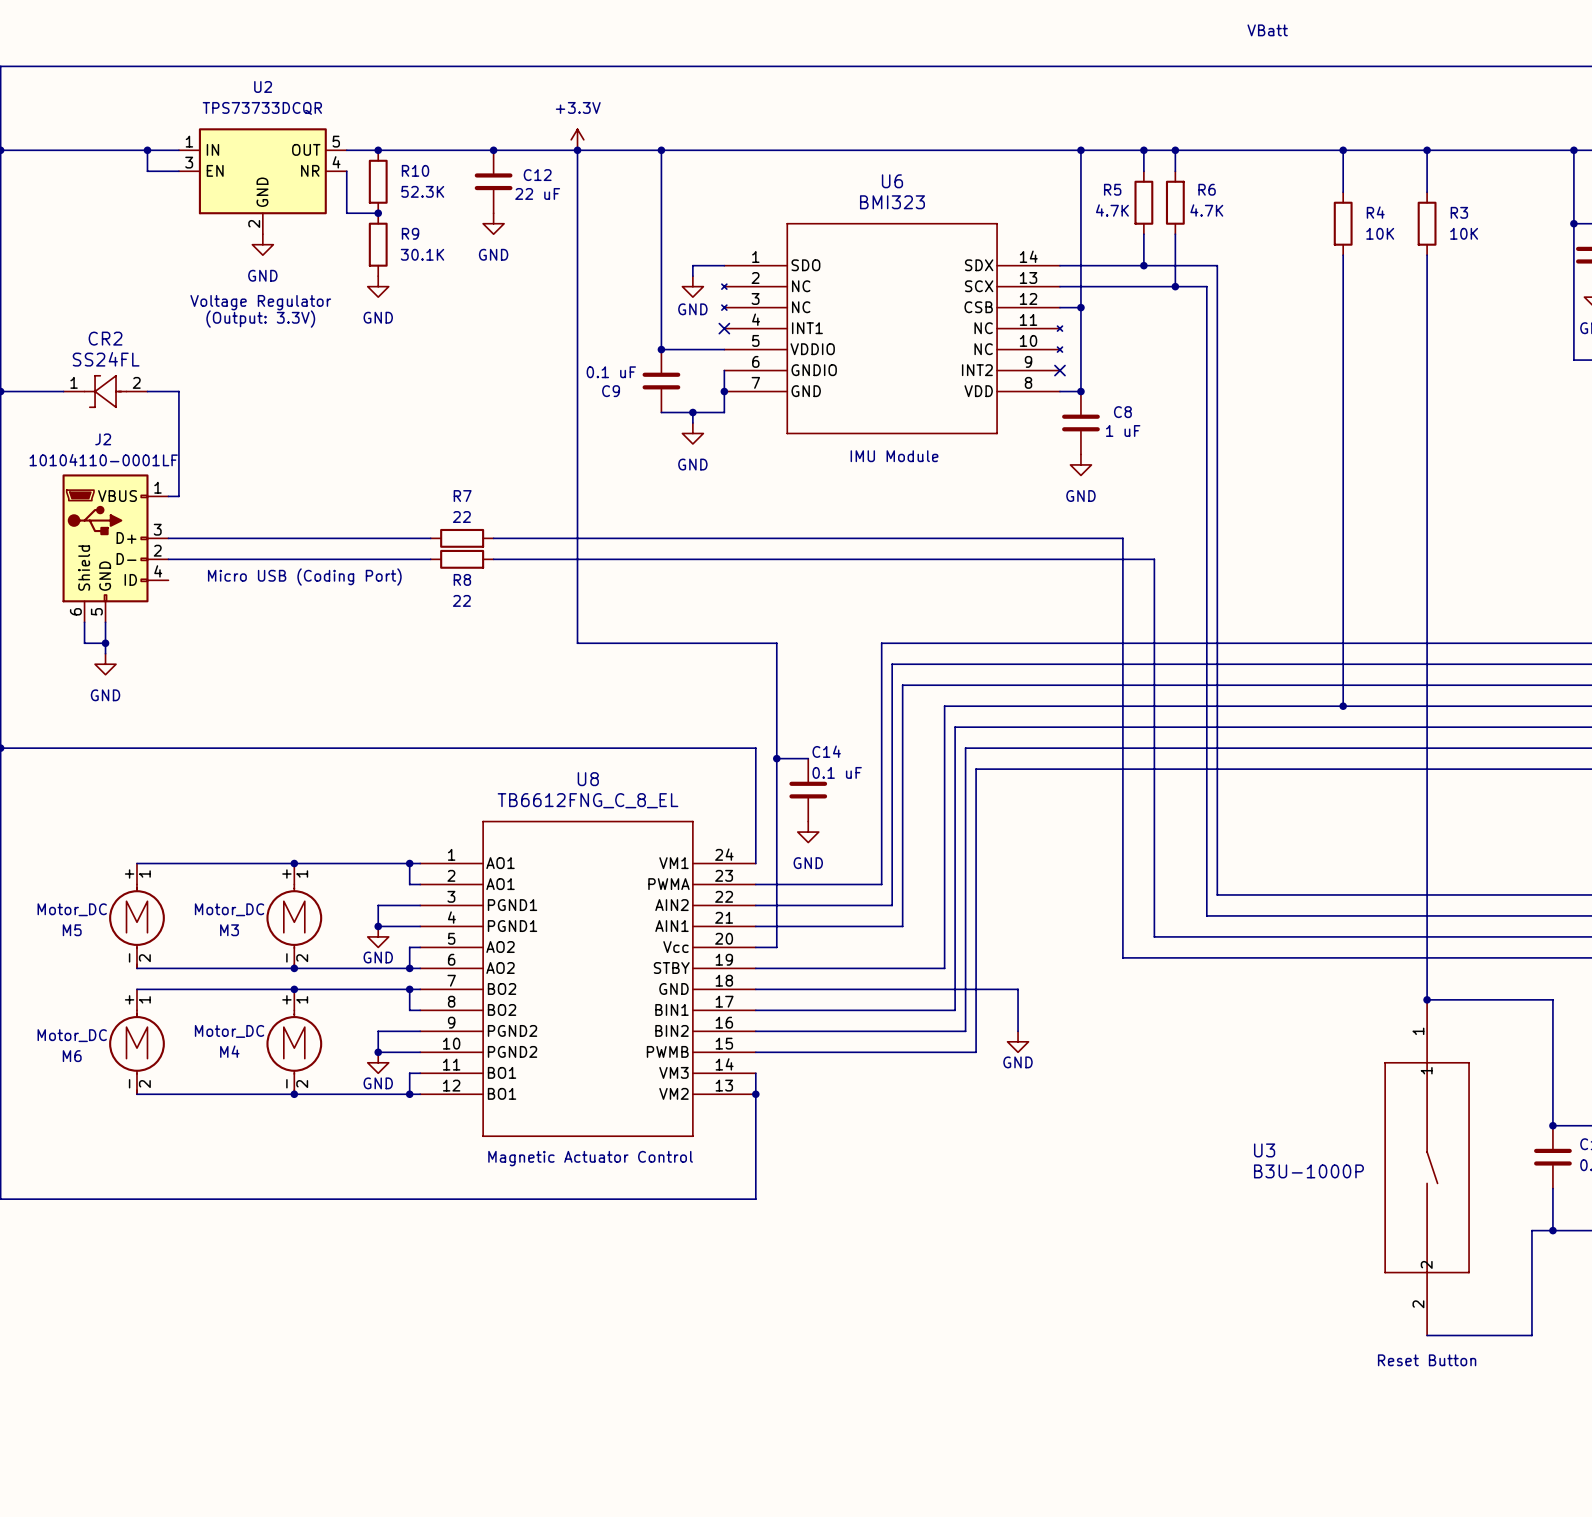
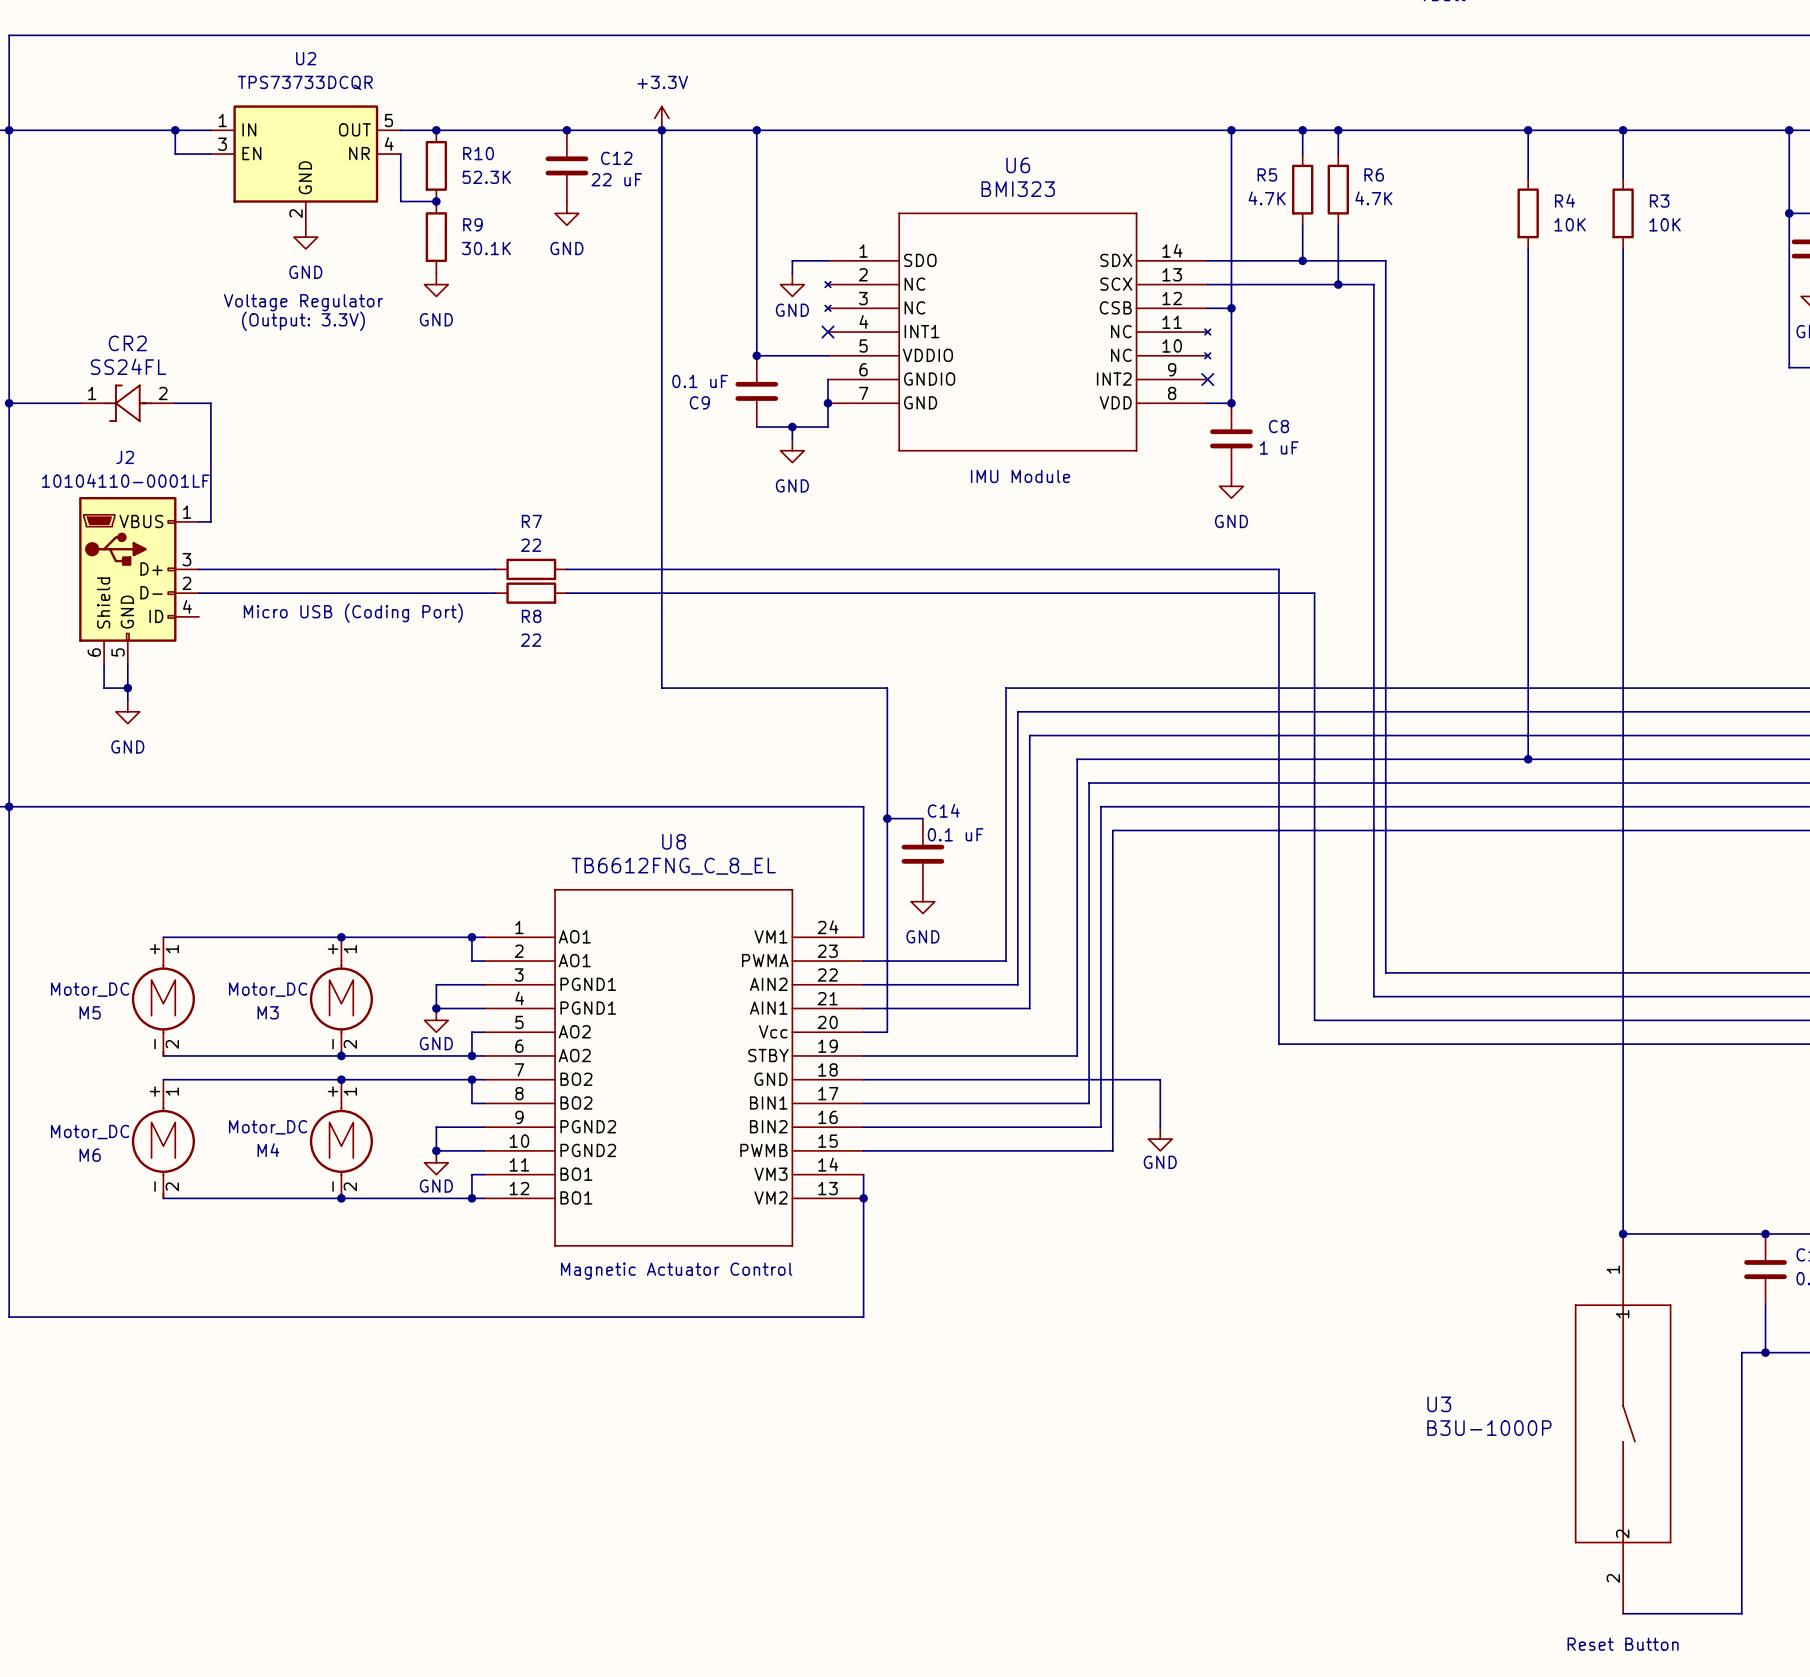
wire: (1427, 999) (1552, 999) (1552, 1125) -> (1623, 1091) (1623, 1233) (1765, 1233)
junction: (1427, 999) -> none
junction: none -> (1623, 1233)
U3 position: (1427, 1167) -> (1623, 1423)
wire: (1427, 1335) (1531, 1335) -> (1623, 1613) (1741, 1613) (1741, 1471)
text position: Reset Button (1427, 1360) -> Reset Button (1623, 1644)

